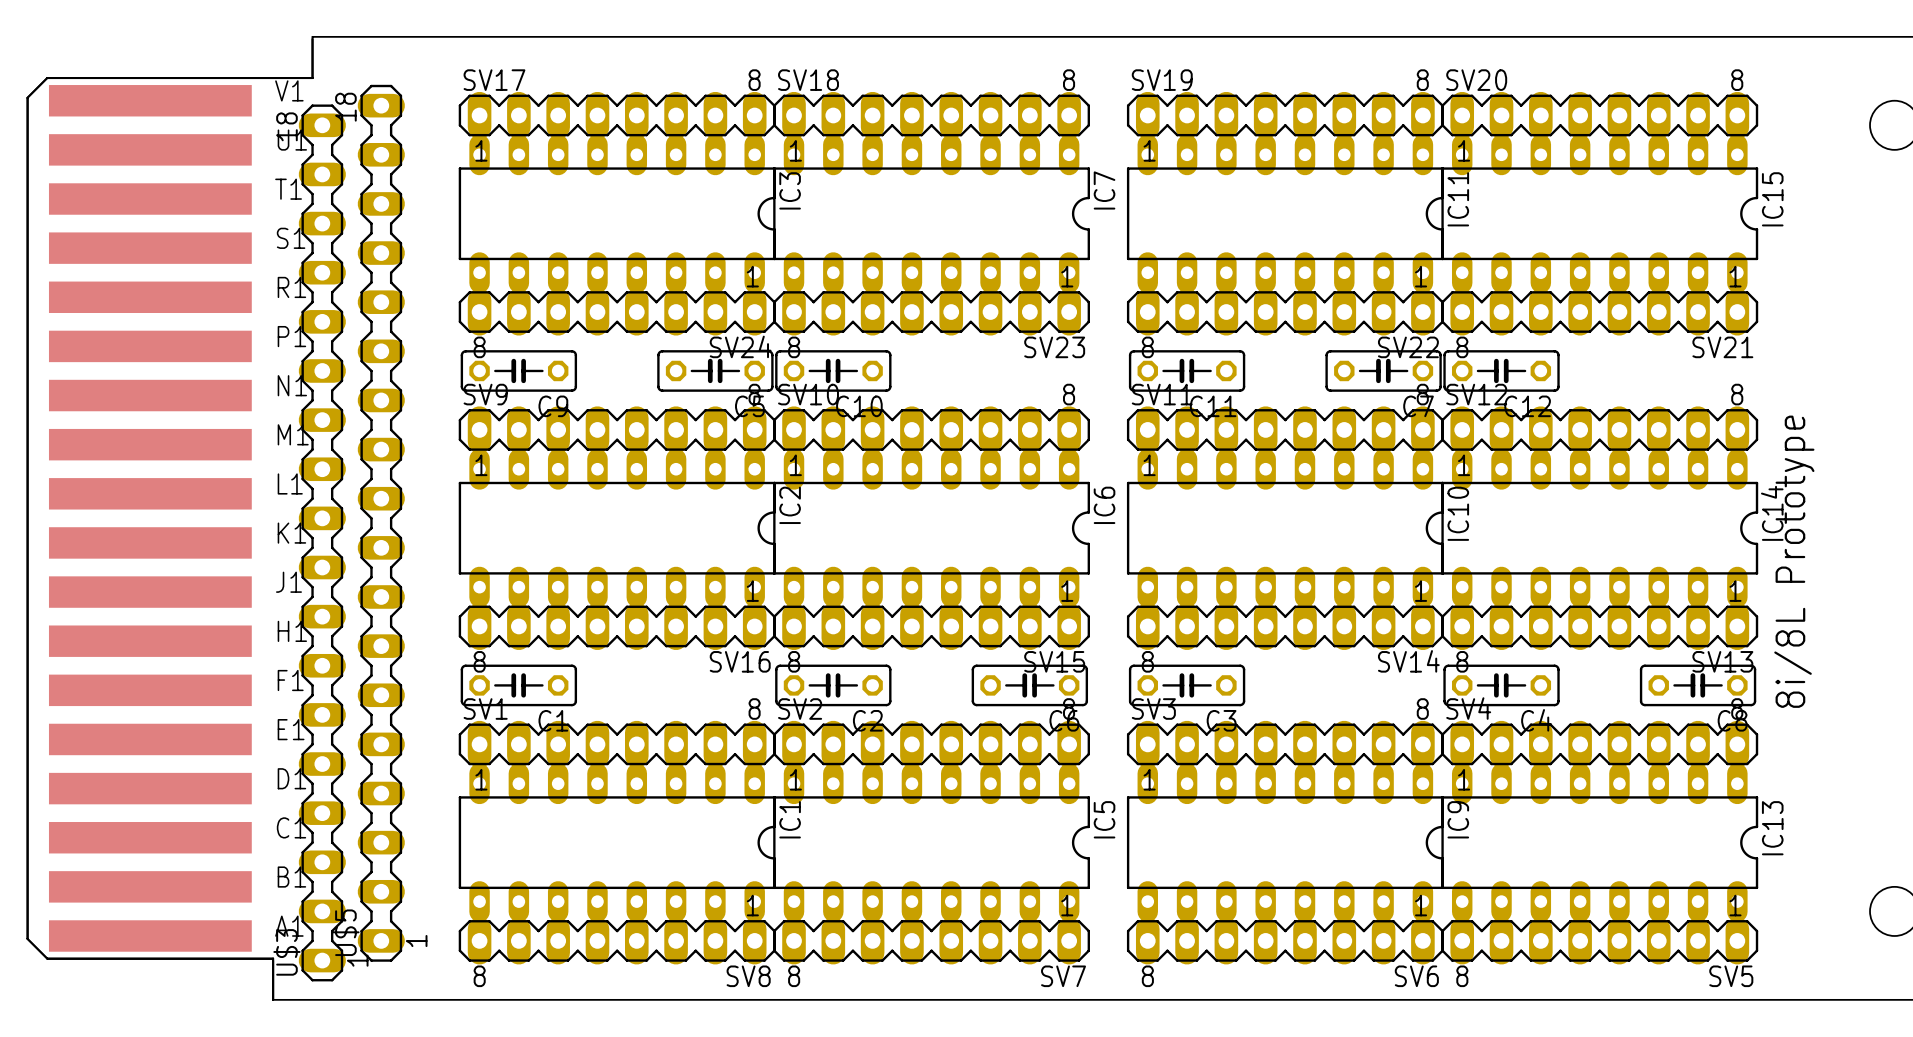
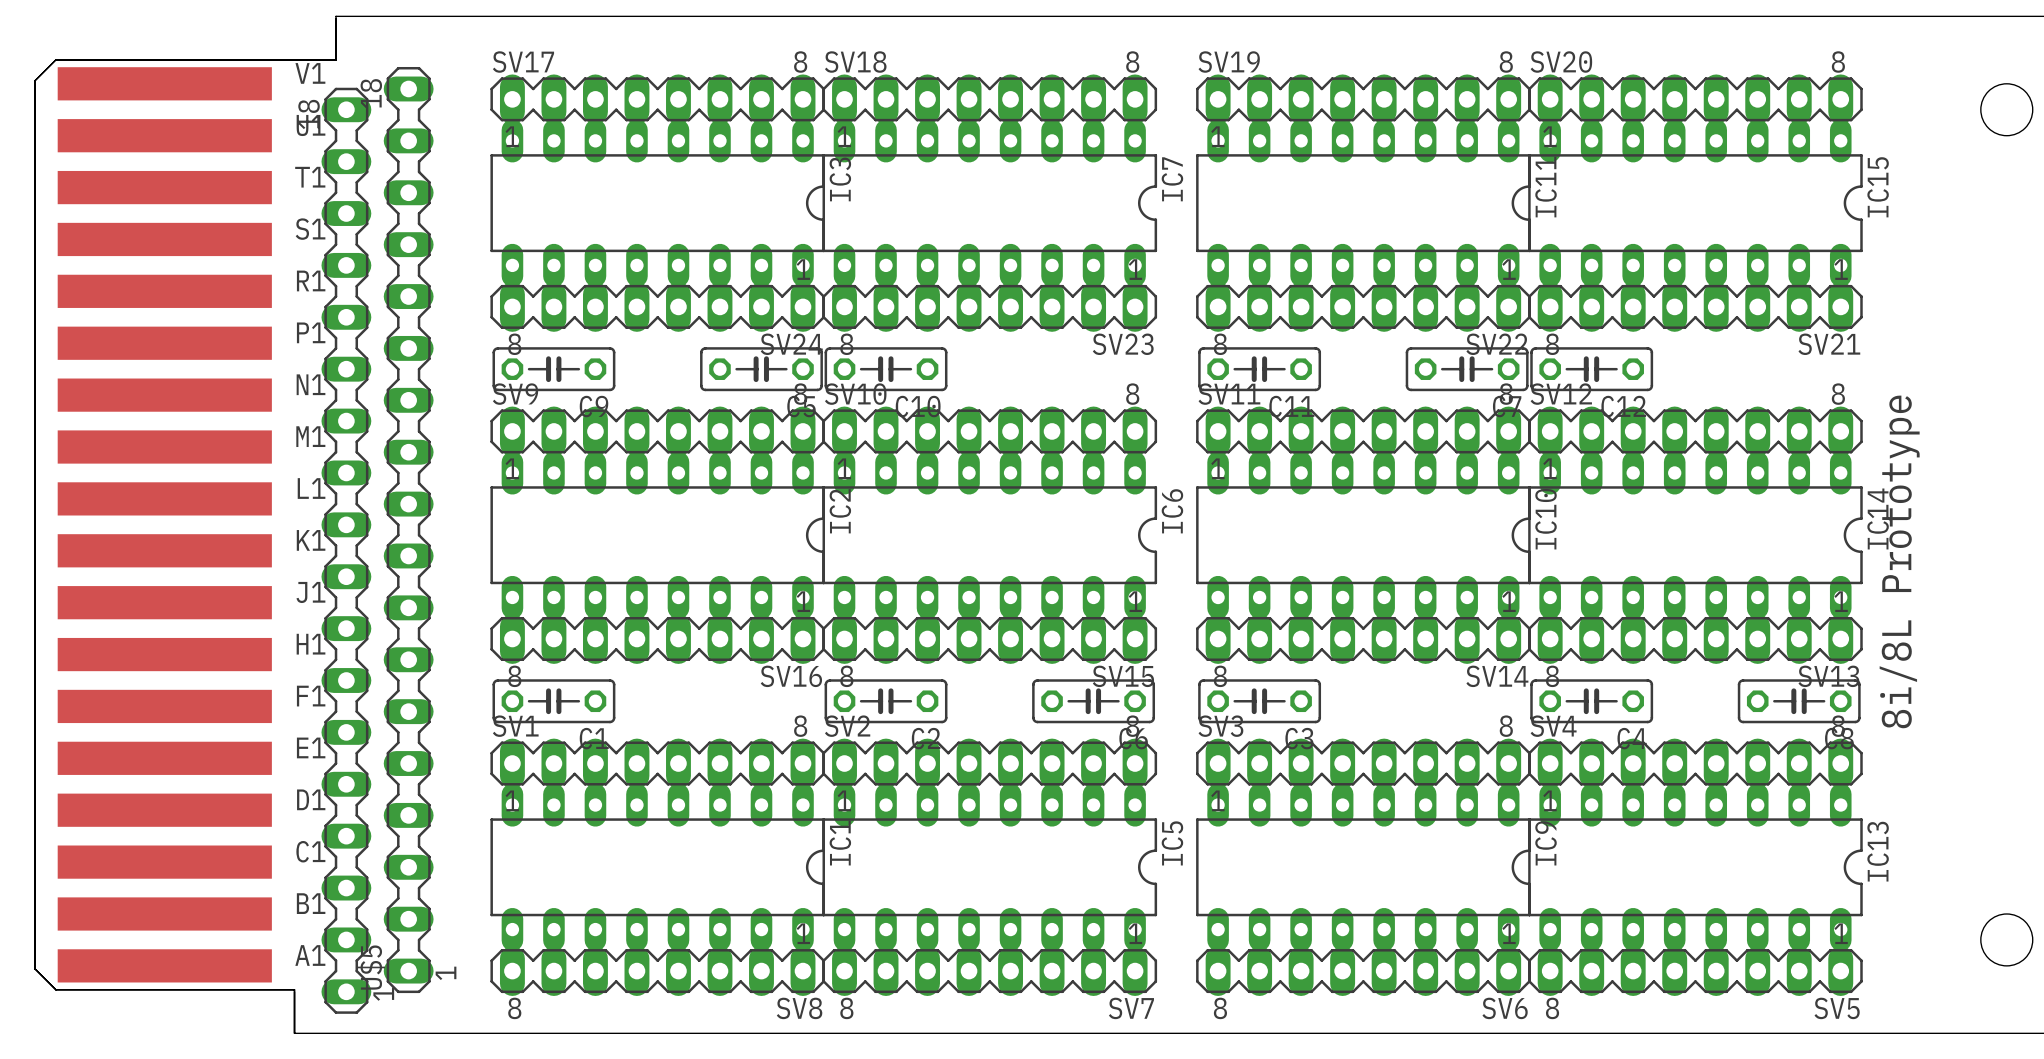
U$3 name: U$3 (286, 952) -> none

